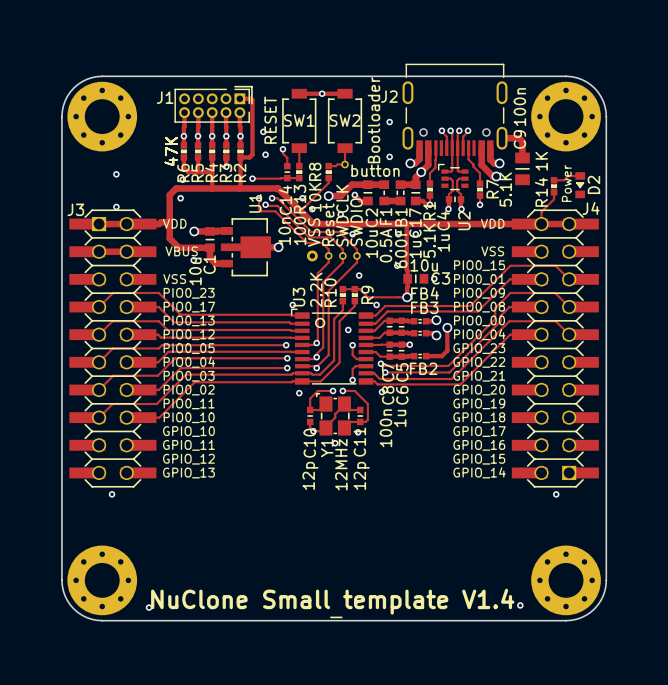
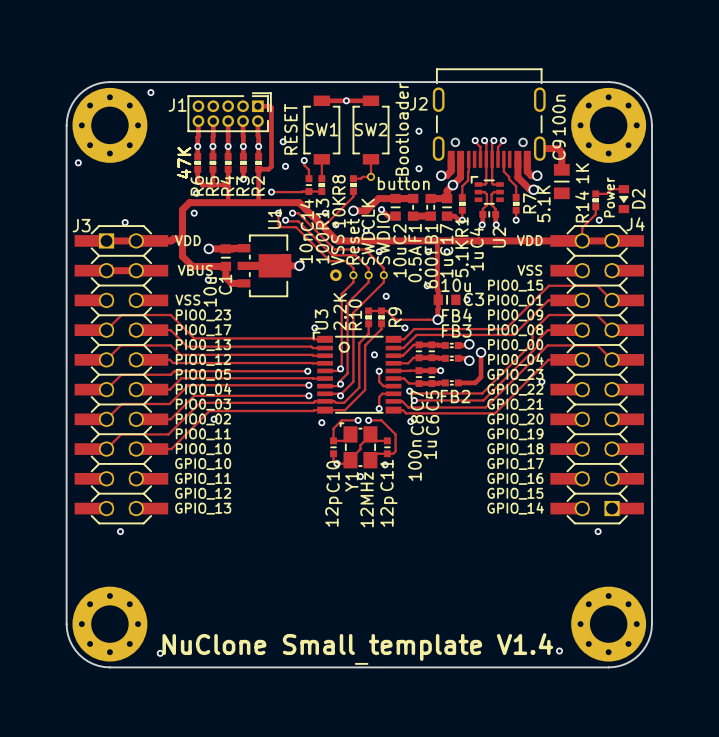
via: none -> (150, 92)
via: none -> (78, 162)
via: (116, 174) -> none
via: none -> (599, 220)
via: none -> (541, 381)
via: none -> (214, 419)

